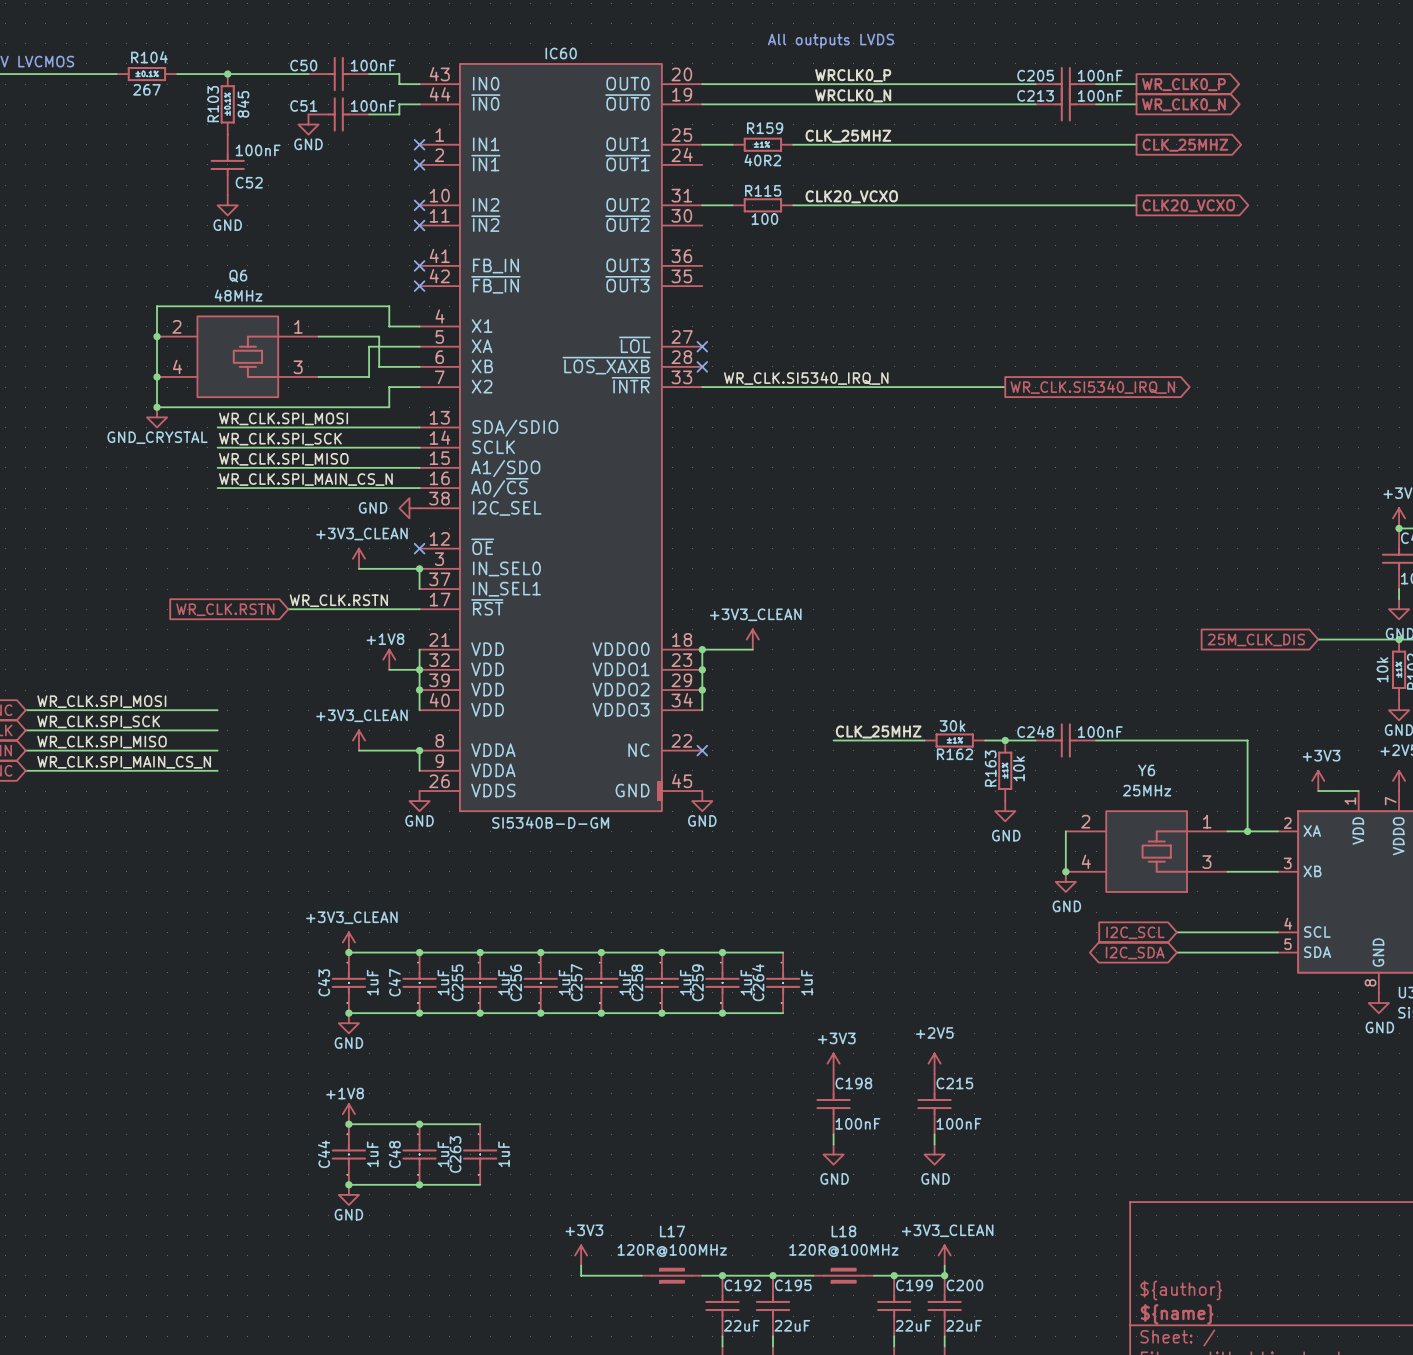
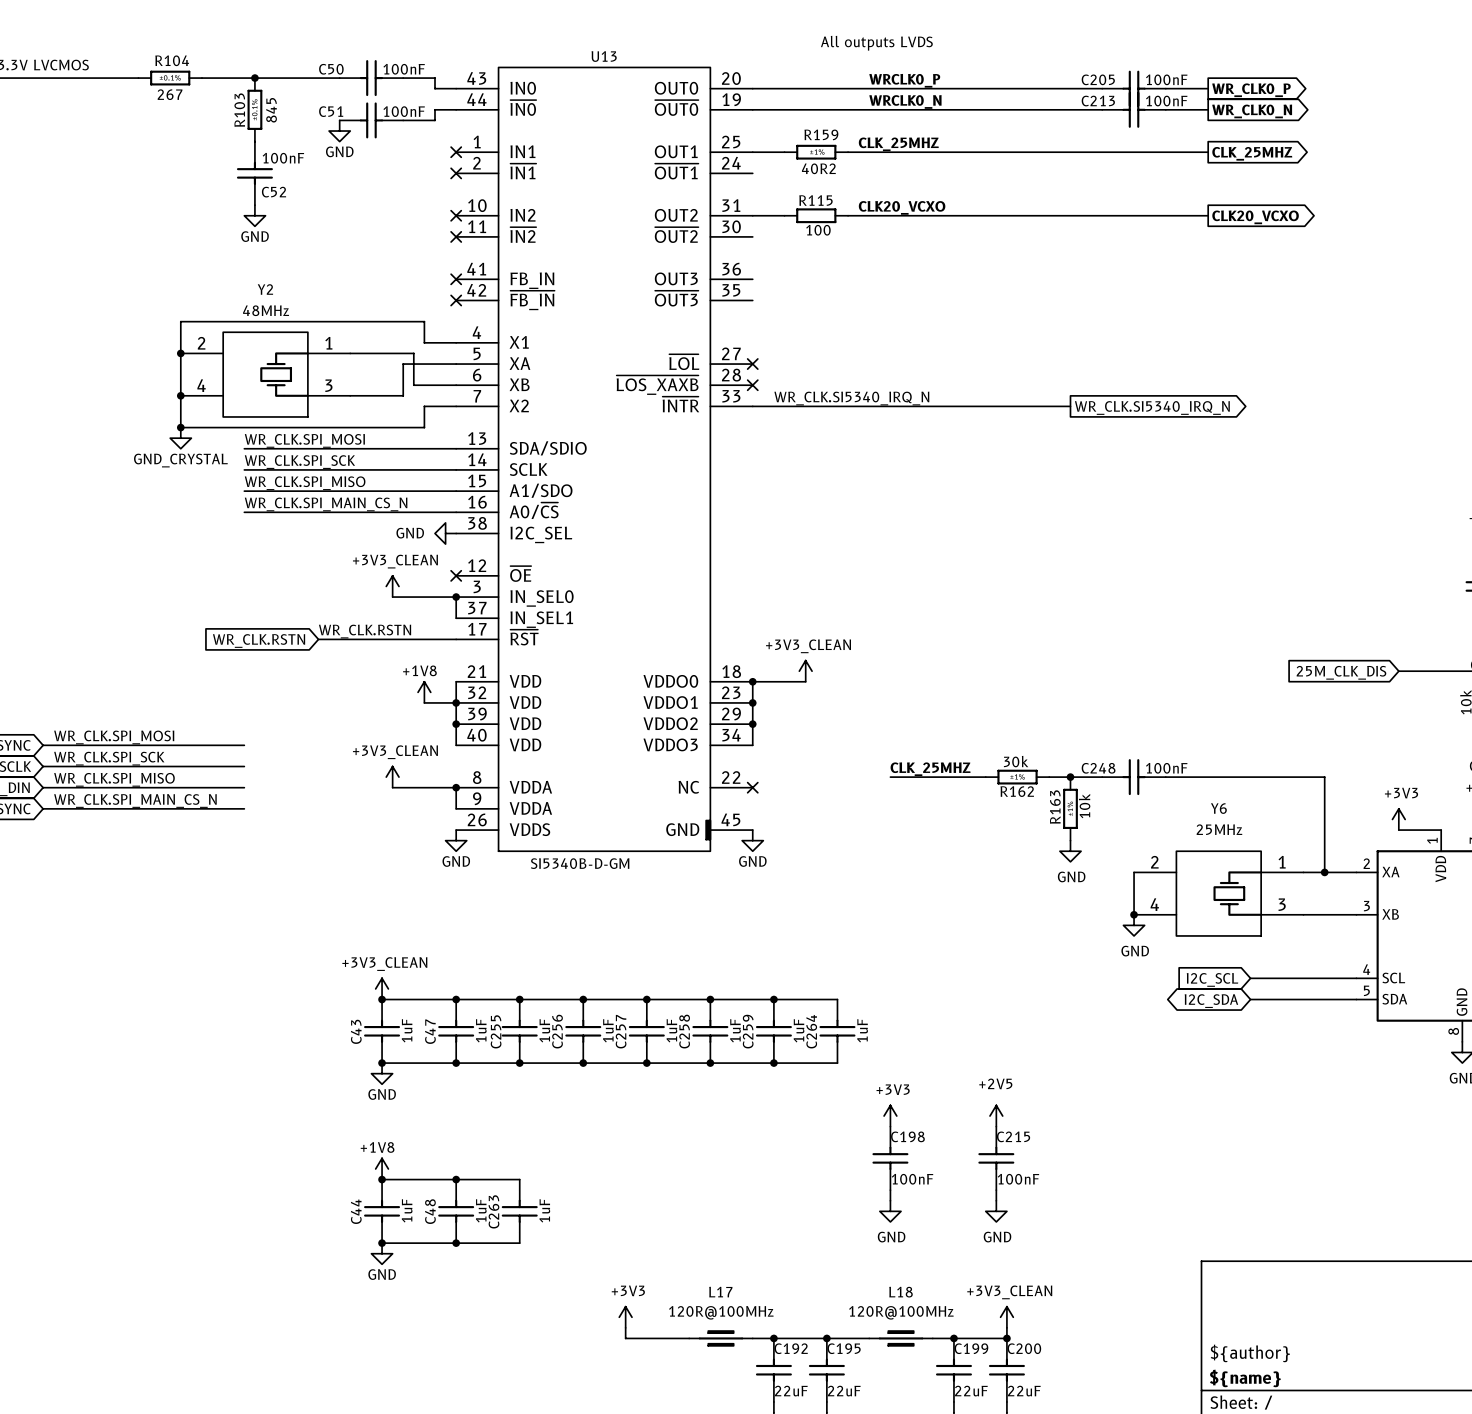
IC60 name: IC60 (561, 53) -> U13 (604, 56)
Q6 name: Q6 (238, 276) -> Y2 (265, 289)

